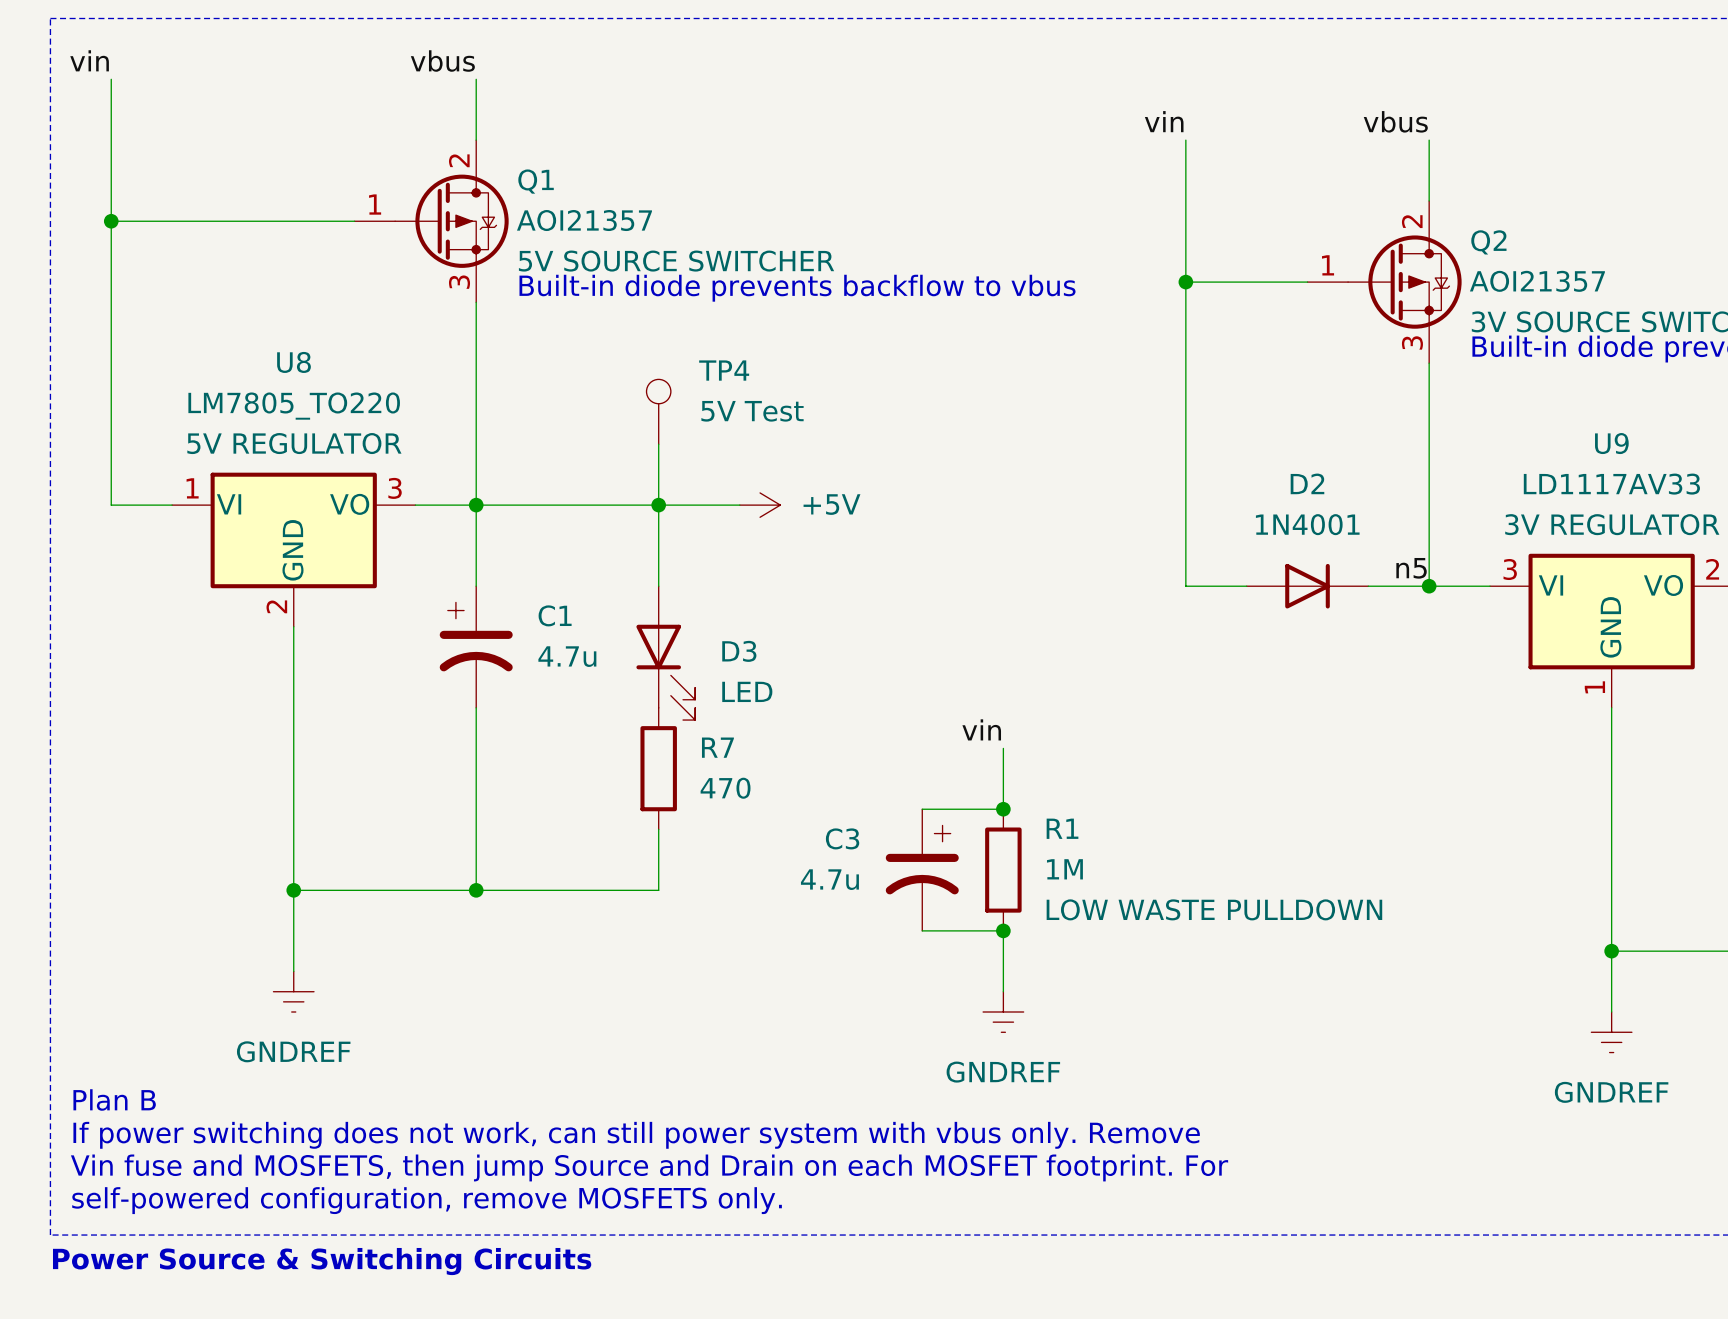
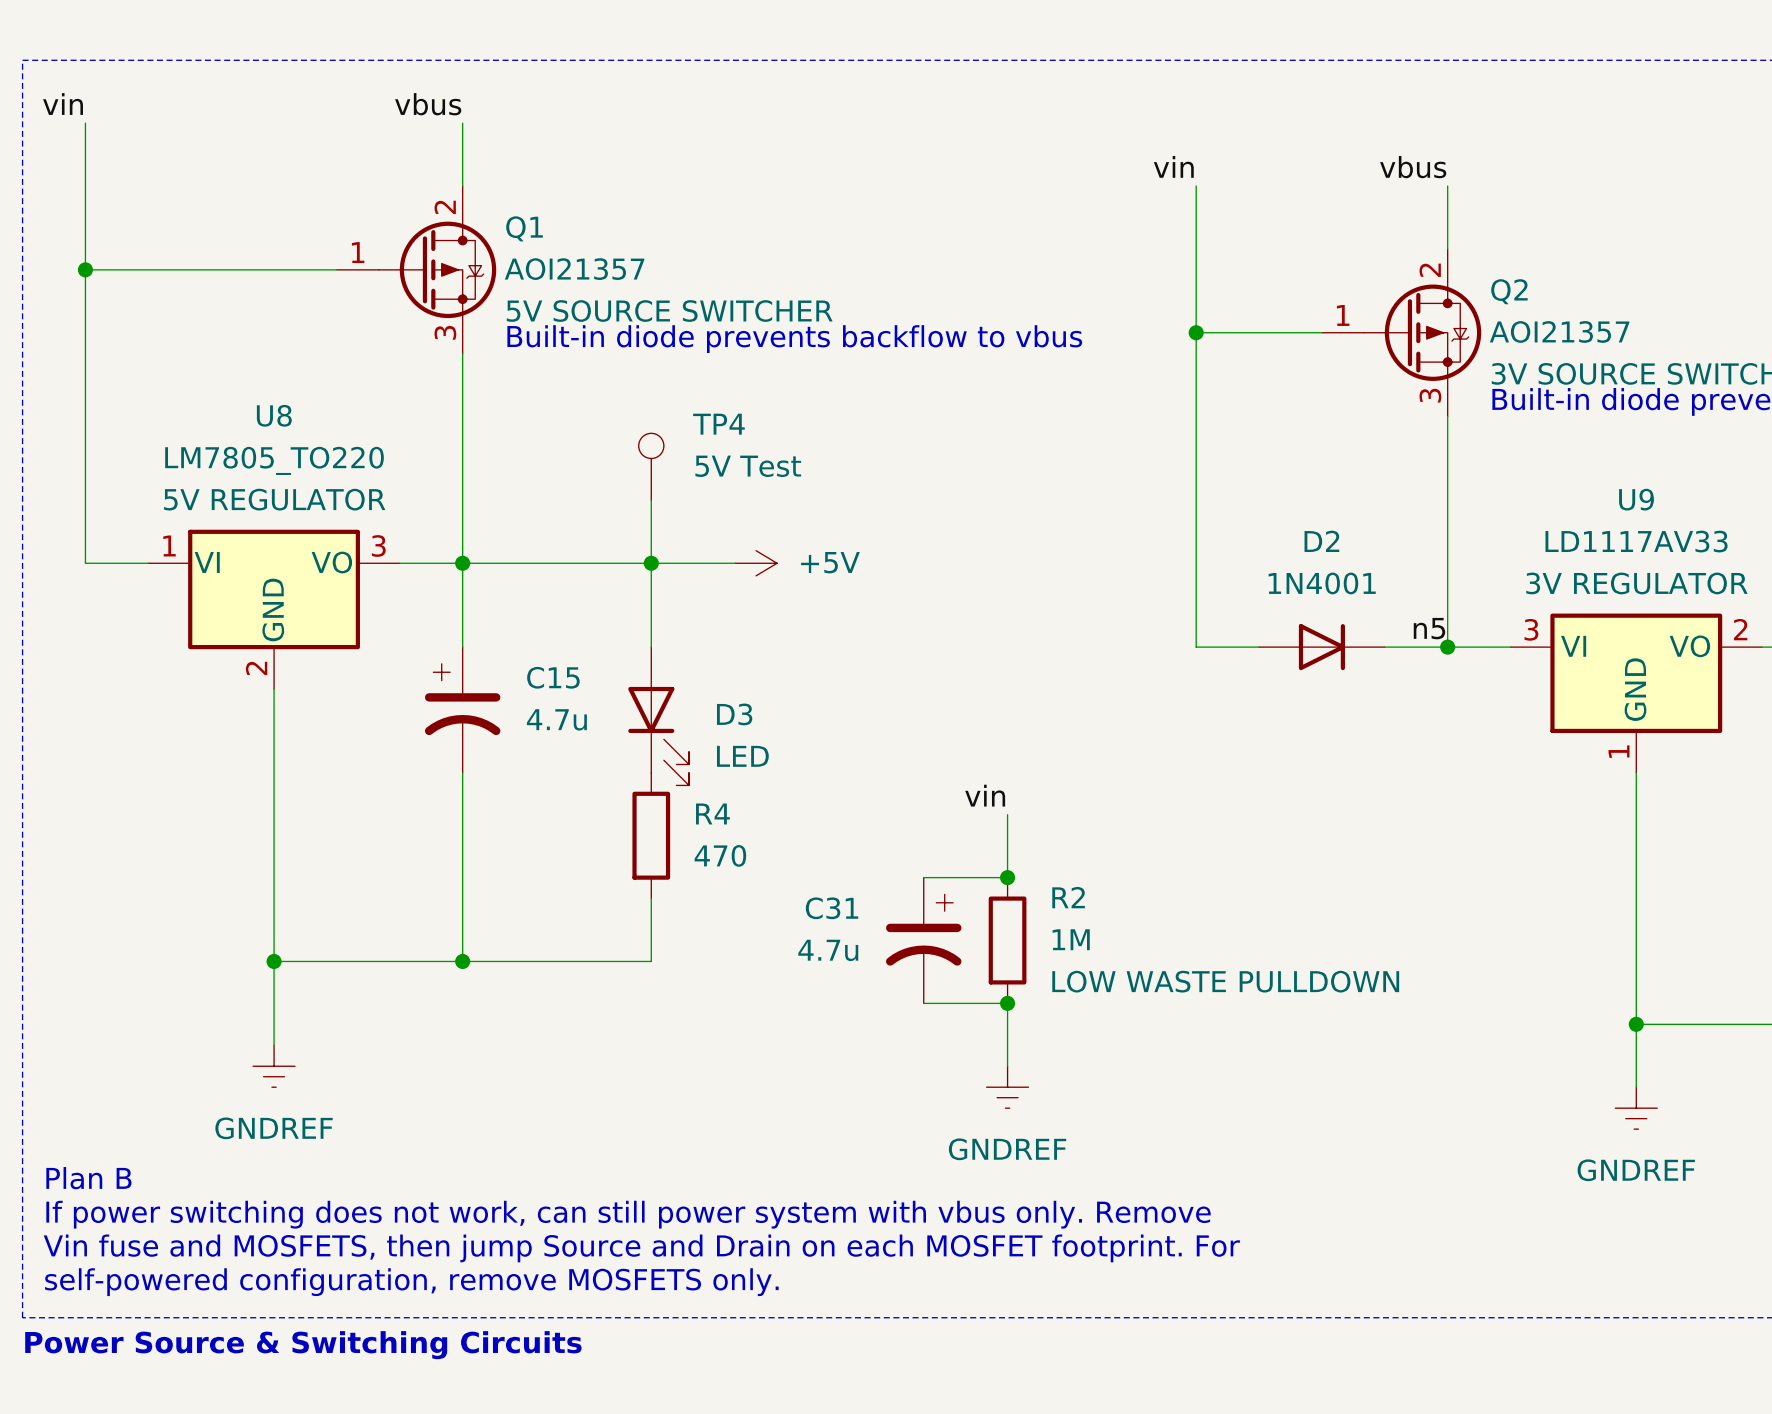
C1 name: C1 (555, 615) -> C15 (553, 677)
R7 name: R7 (717, 747) -> R4 (712, 813)
R1 name: R1 (1062, 828) -> R2 (1068, 897)
C3 name: C3 (842, 838) -> C31 (832, 908)

